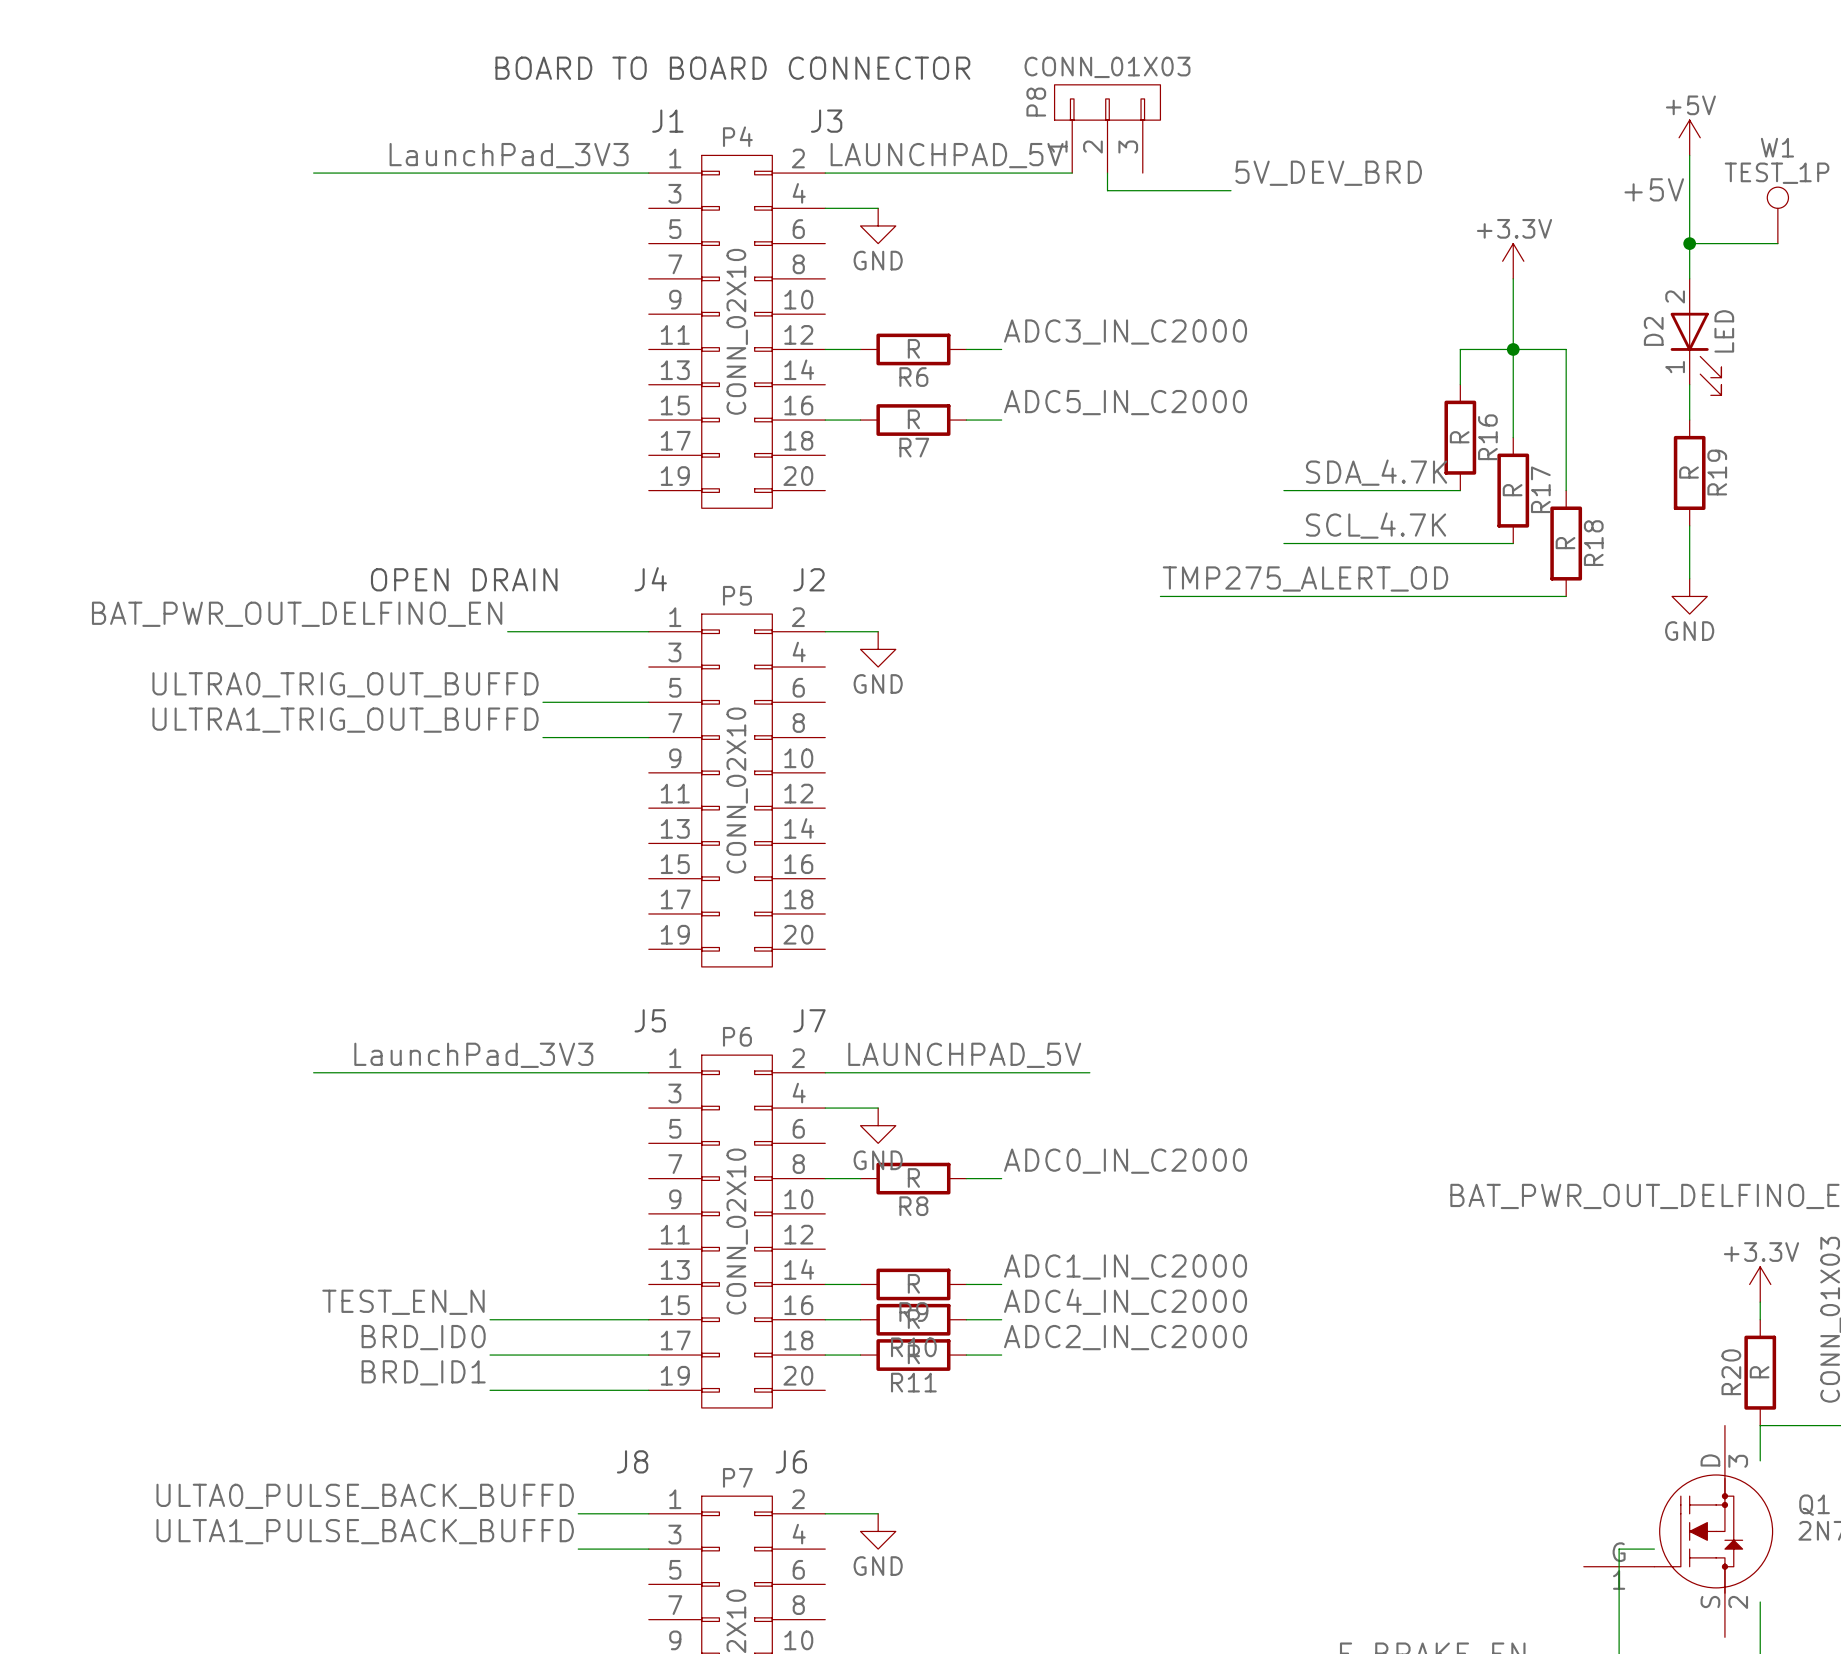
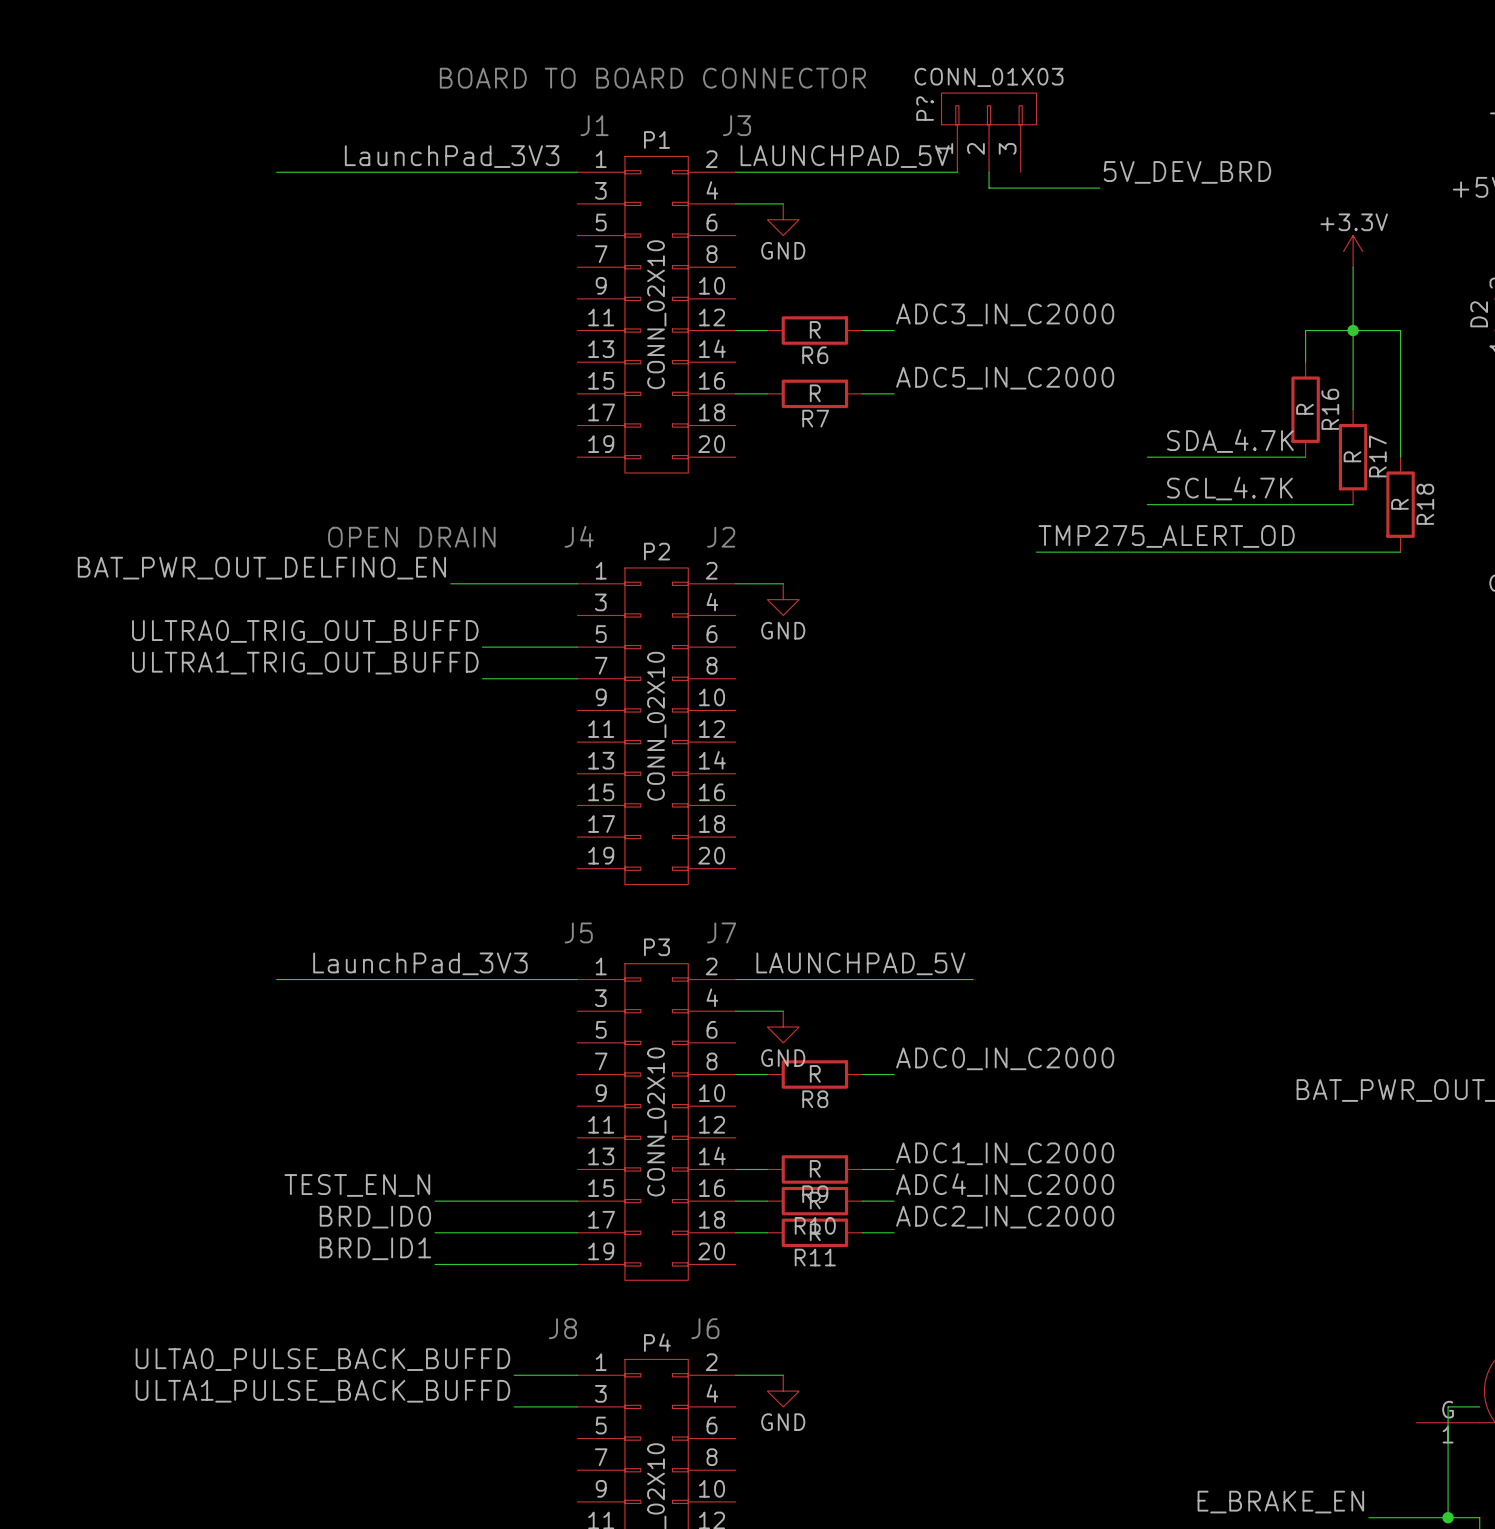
P8 name: P8 (1036, 102) -> P? (925, 108)
P4 name: P4 (737, 136) -> P1 (656, 140)
P5 name: P5 (737, 595) -> P2 (656, 551)
P6 name: P6 (737, 1036) -> P3 (656, 947)
P7 name: P7 (737, 1477) -> P4 (657, 1342)

